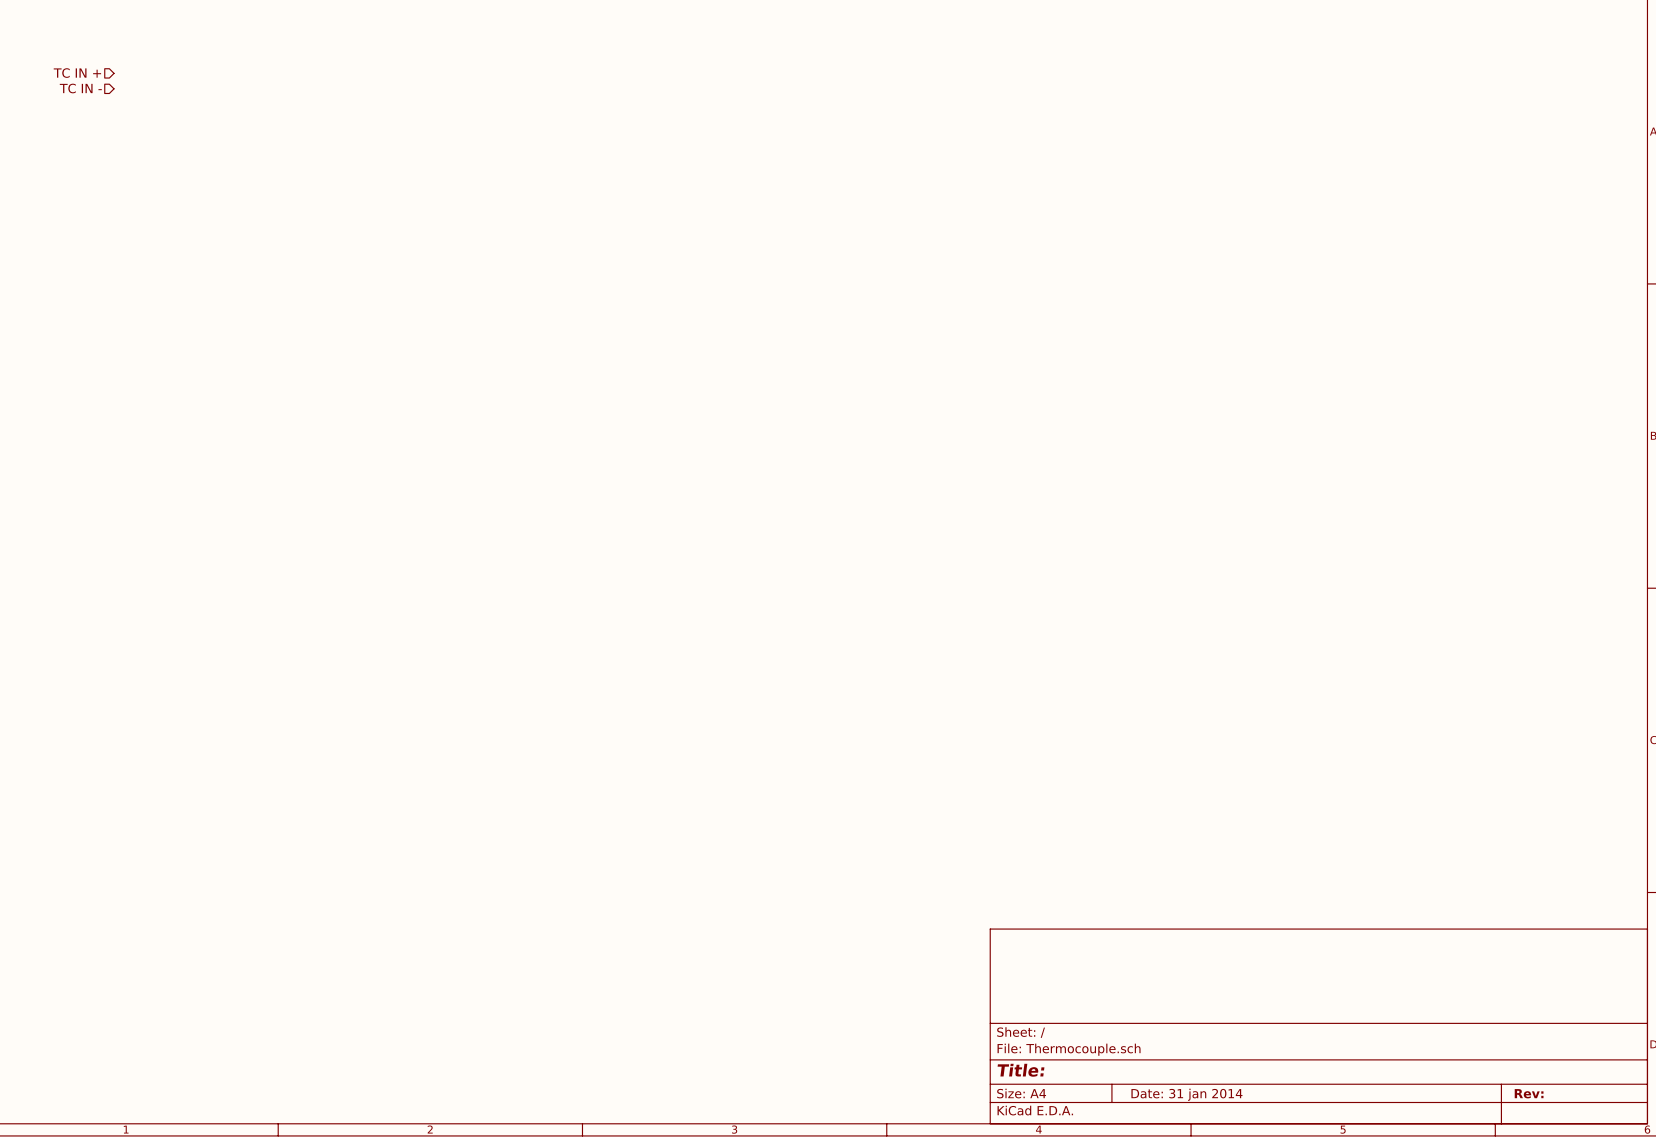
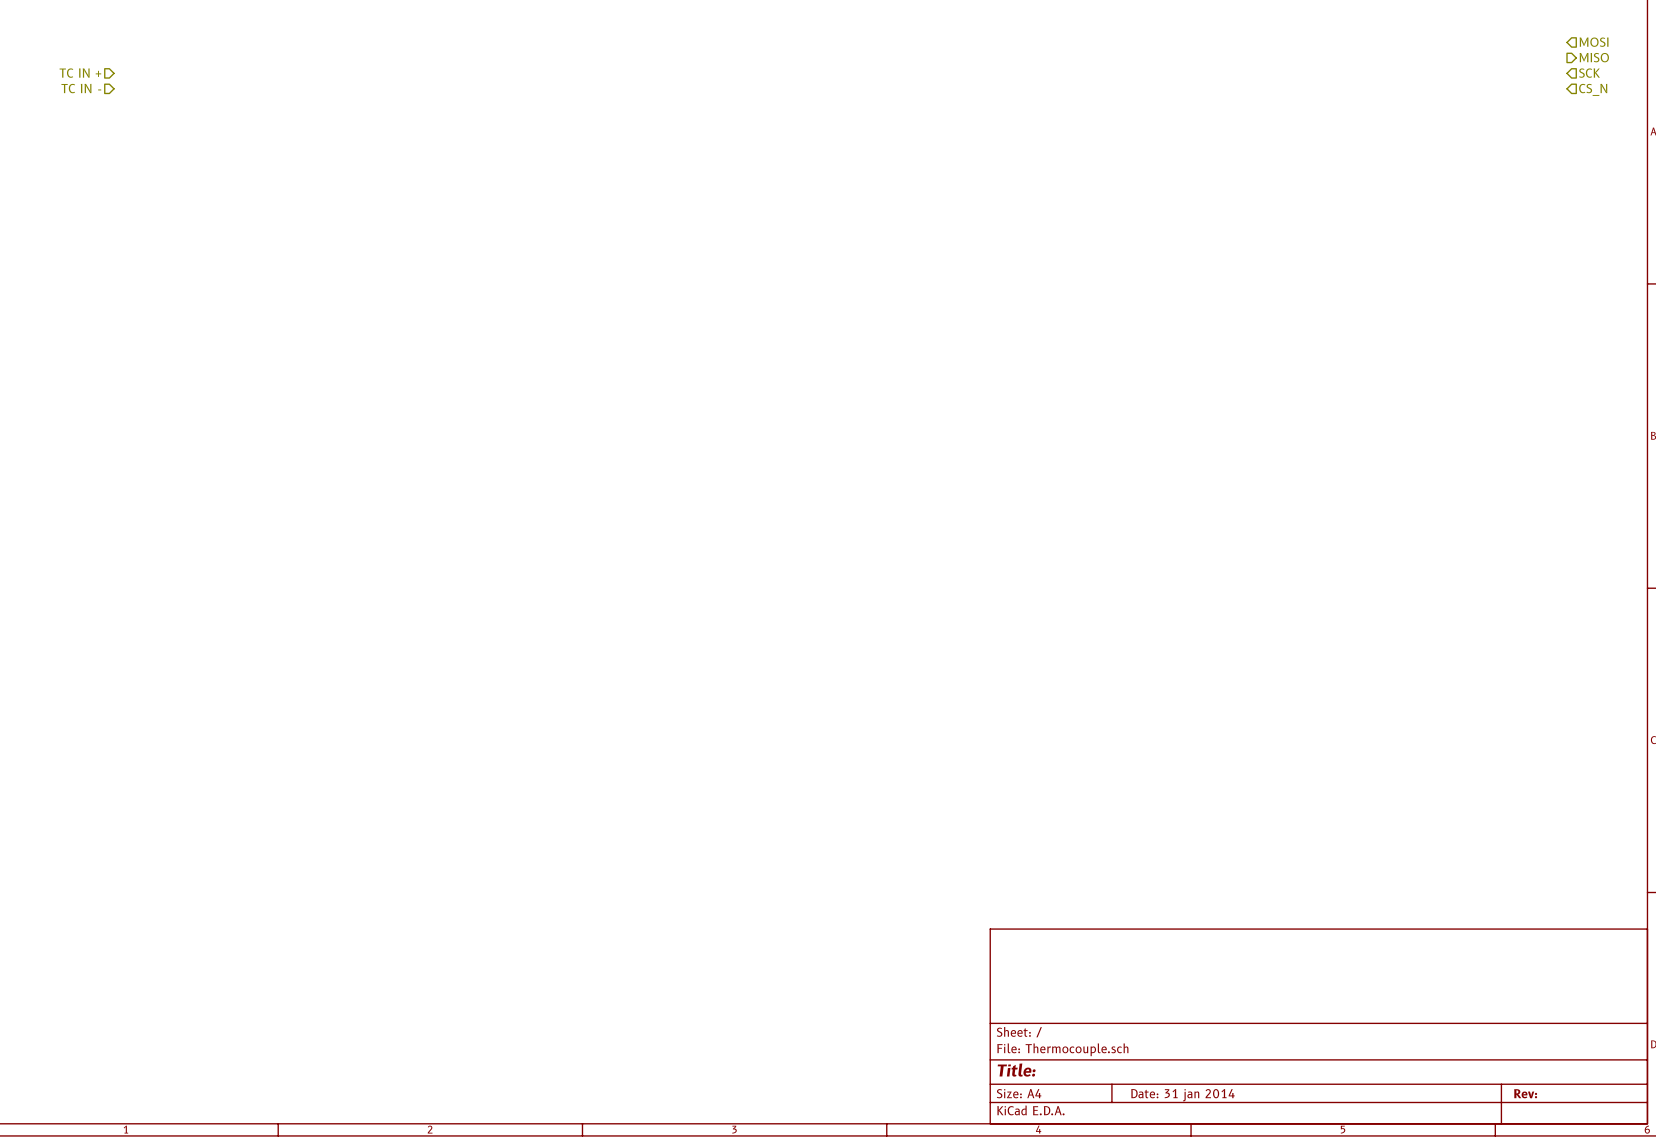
hierarchical label: none -> MOSI (1594, 42)
hierarchical label: none -> MISO (1594, 57)
hierarchical label: none -> SCK (1589, 73)
hierarchical label: none -> CS_N (1593, 89)

